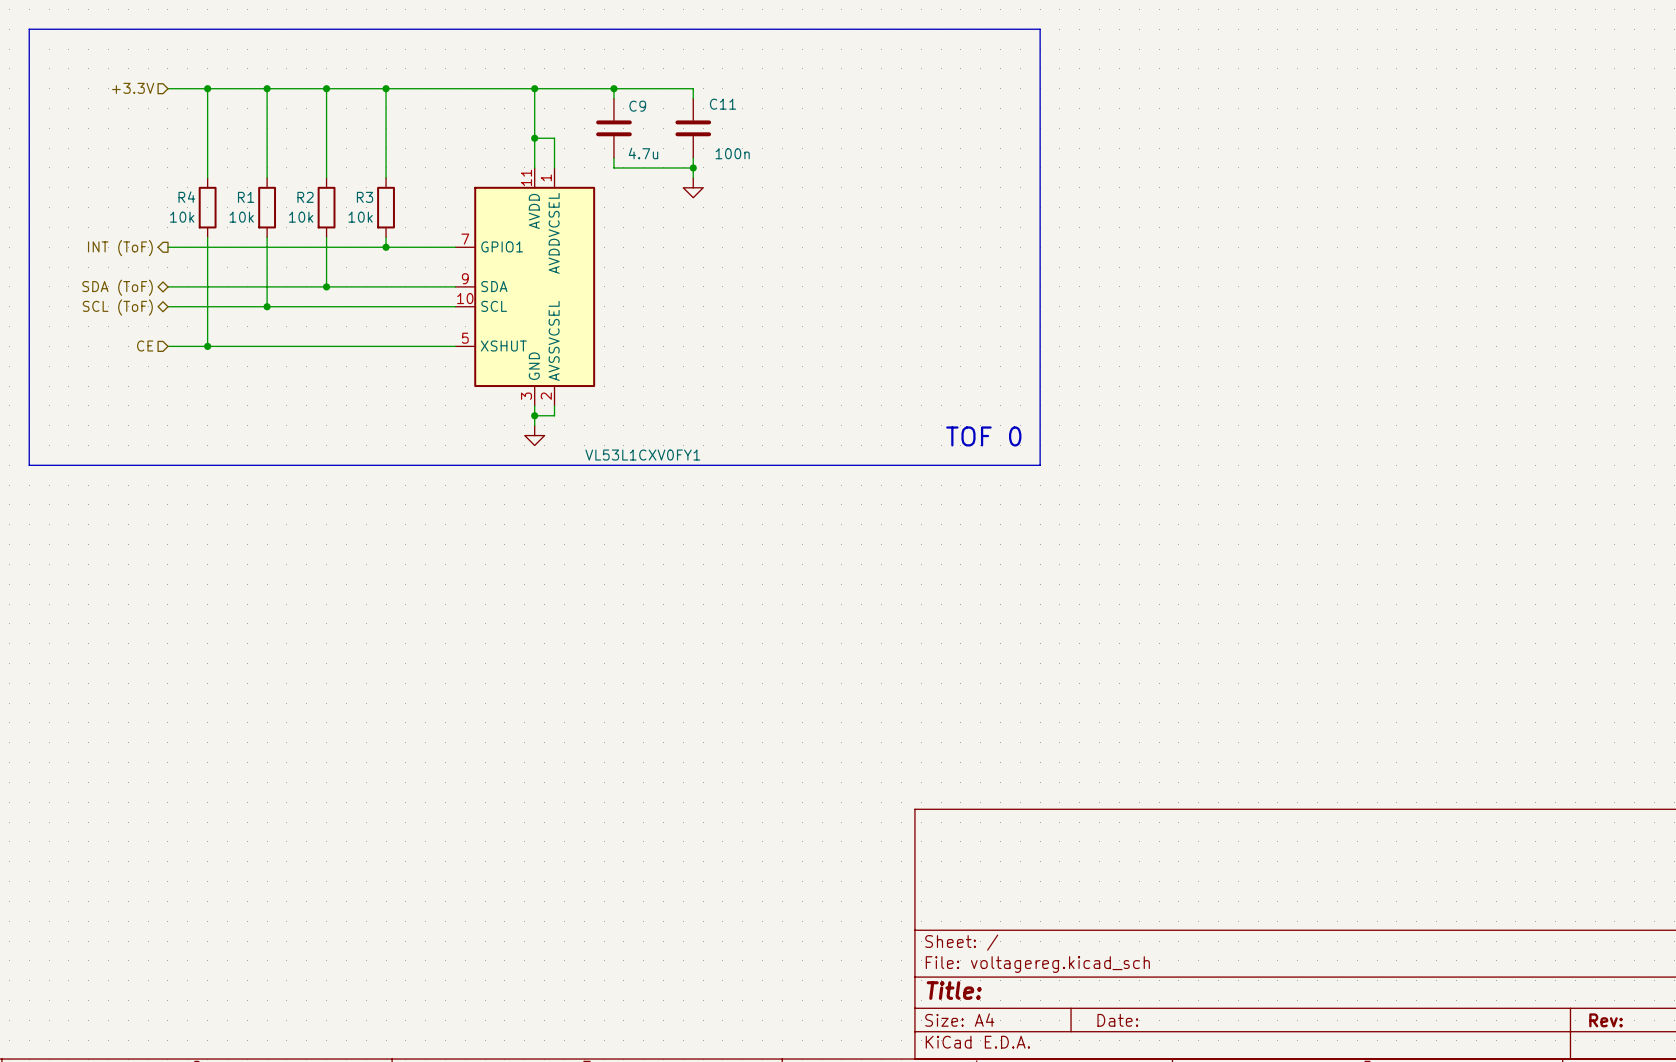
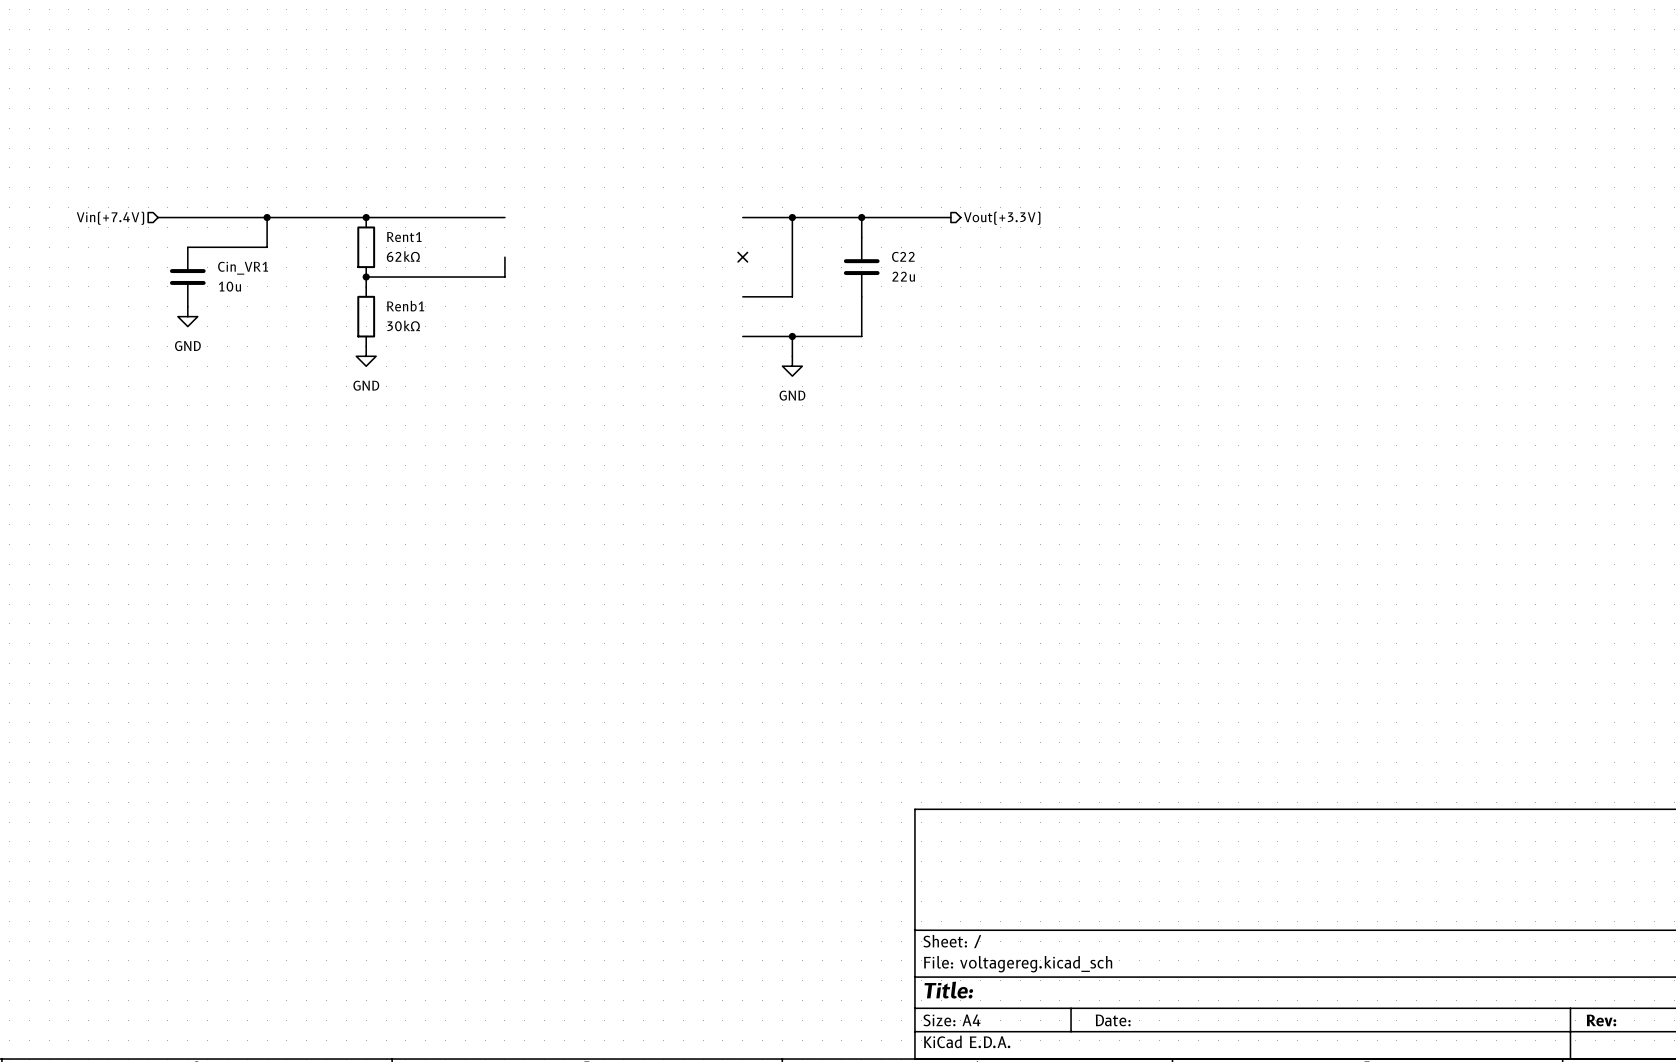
line: (29, 29) (1040, 29) (1040, 465) (29, 465) (29, 29) -> none
hierarchical label: +3.3V (133, 88) -> none
wire: (167, 88) (693, 88) (693, 98) -> none
wire: (207, 88) (207, 177) -> none
junction: (207, 88) -> none
wire: (267, 88) (267, 177) -> none
junction: (267, 88) -> none
wire: (326, 88) (326, 177) -> none
junction: (326, 88) -> none
wire: (386, 88) (386, 177) -> none
junction: (386, 88) -> none
wire: (534, 88) (534, 167) -> none
junction: (534, 88) -> none
wire: (613, 88) (613, 98) -> none
junction: (613, 88) -> none
C9: 4.7u (613, 128) -> none
C11: 100n (693, 128) -> none
wire: (534, 138) (554, 138) (554, 167) -> none
junction: (534, 138) -> none
wire: (613, 158) (613, 167) (693, 167) -> none
wire: (693, 158) (693, 177) -> (861, 217) (861, 237)
junction: (693, 167) -> none
power symbol: (693, 187) -> none
R4: 10k (207, 207) -> none
R1: 10k (267, 207) -> none
R2: 10k (326, 207) -> none
R3: 10k (386, 207) -> none
wire: none -> (158, 217) (504, 217)
junction: none -> (267, 217)
junction: none -> (366, 217)
wire: none -> (742, 217) (950, 217)
wire: none -> (792, 217) (792, 296) (742, 296)
junction: none -> (792, 217)
junction: none -> (861, 217)
hierarchical label: none -> Vin(+7.4V) (110, 218)
hierarchical label: none -> Vout(+3.3V) (1002, 218)
wire: (207, 237) (207, 346) -> none
wire: (326, 237) (326, 286) -> none
wire: (386, 237) (386, 247) -> none
wire: (167, 247) (187, 247) -> none
Rent1: none -> 62kΩ (366, 247)
junction: (386, 247) -> none
wire: (455, 247) (267, 247) (267, 306) -> none
hierarchical label: INT (ToF) (120, 248) -> none
wire: none -> (504, 257) (504, 277) (366, 277) (366, 286)
no-connect mark: none -> (742, 257)
C22: none -> 22u (861, 267)
Cin_VR1: none -> 10u (187, 277)
junction: none -> (366, 277)
wire: (167, 286) (455, 286) -> none
junction: (326, 286) -> none
part: VL53L1CXV0FY1 (525, 286) -> none
hierarchical label: SDA (ToF) (117, 287) -> none
wire: none -> (861, 296) (861, 336) (742, 336)
wire: (167, 306) (455, 306) -> none
junction: (267, 306) -> none
hierarchical label: SCL (ToF) (117, 307) -> none
power symbol: none -> GND (187, 316)
Renb1: none -> 30kΩ (366, 316)
wire: none -> (792, 336) (792, 356)
junction: none -> (792, 336)
hierarchical label: CE (145, 346) -> none
wire: (167, 346) (455, 346) -> none
junction: (207, 346) -> none
power symbol: none -> GND (366, 356)
power symbol: none -> GND (792, 366)
wire: (534, 405) (534, 425) -> none
wire: (554, 405) (554, 415) (534, 415) -> none
junction: (534, 415) -> none
power symbol: (534, 435) -> none
text: TOF 0 (983, 436) -> none

